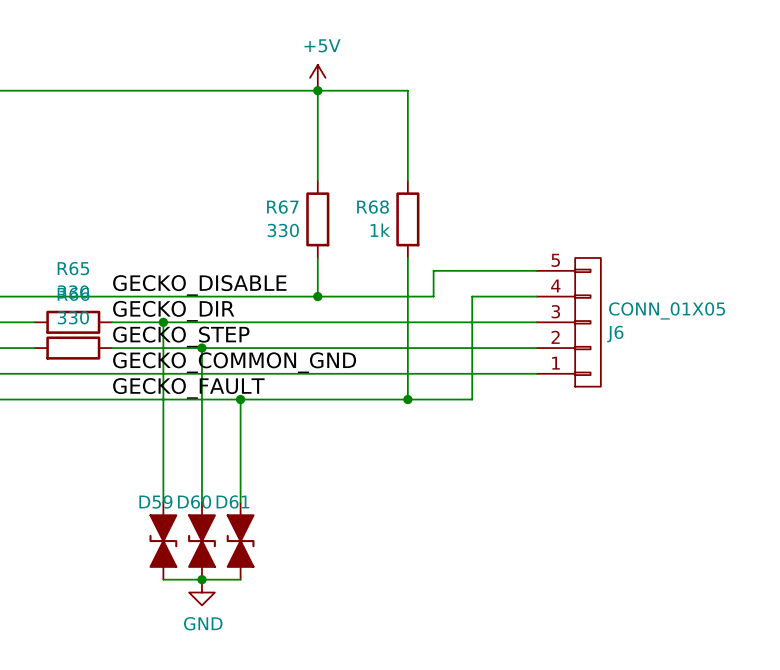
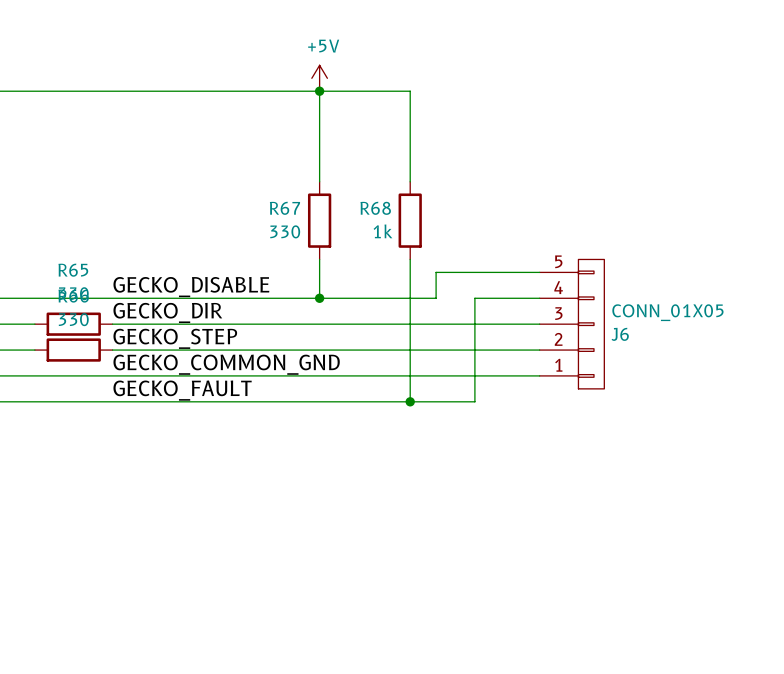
wire: (163, 322) (163, 502) -> none
junction: (163, 322) -> none
wire: (201, 348) (201, 502) -> none
junction: (201, 348) -> none
wire: (240, 399) (240, 502) -> none
junction: (240, 399) -> none
D59: (163, 541) -> none
D60: (201, 541) -> none
D61: (240, 541) -> none
wire: (163, 579) (240, 579) -> none
junction: (201, 579) -> none
power symbol: GND (201, 592) -> none

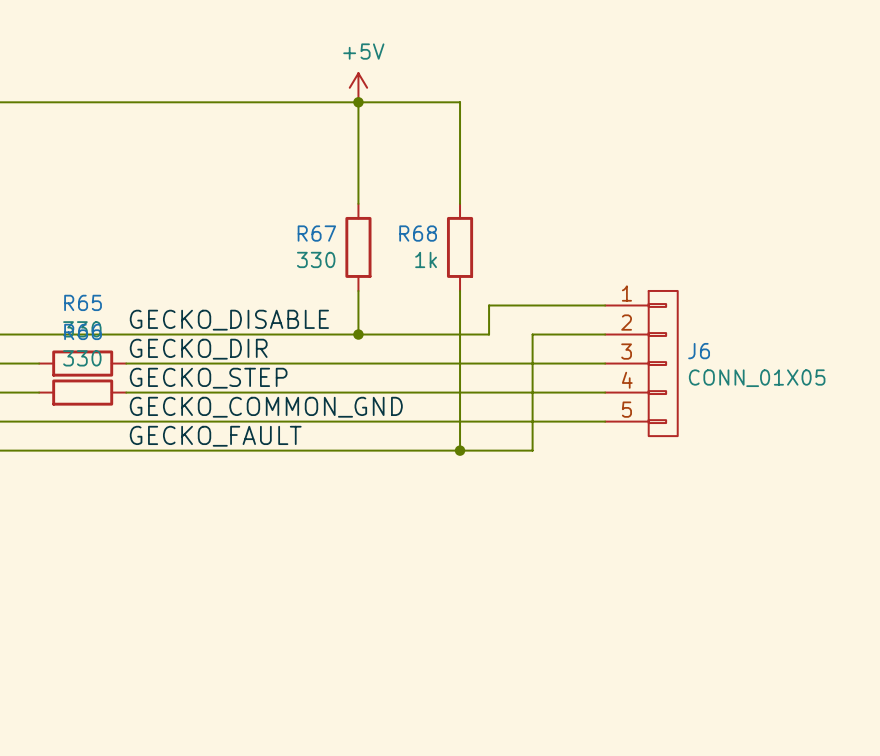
J6 flip: as is (591, 324) -> up-down (663, 363)

